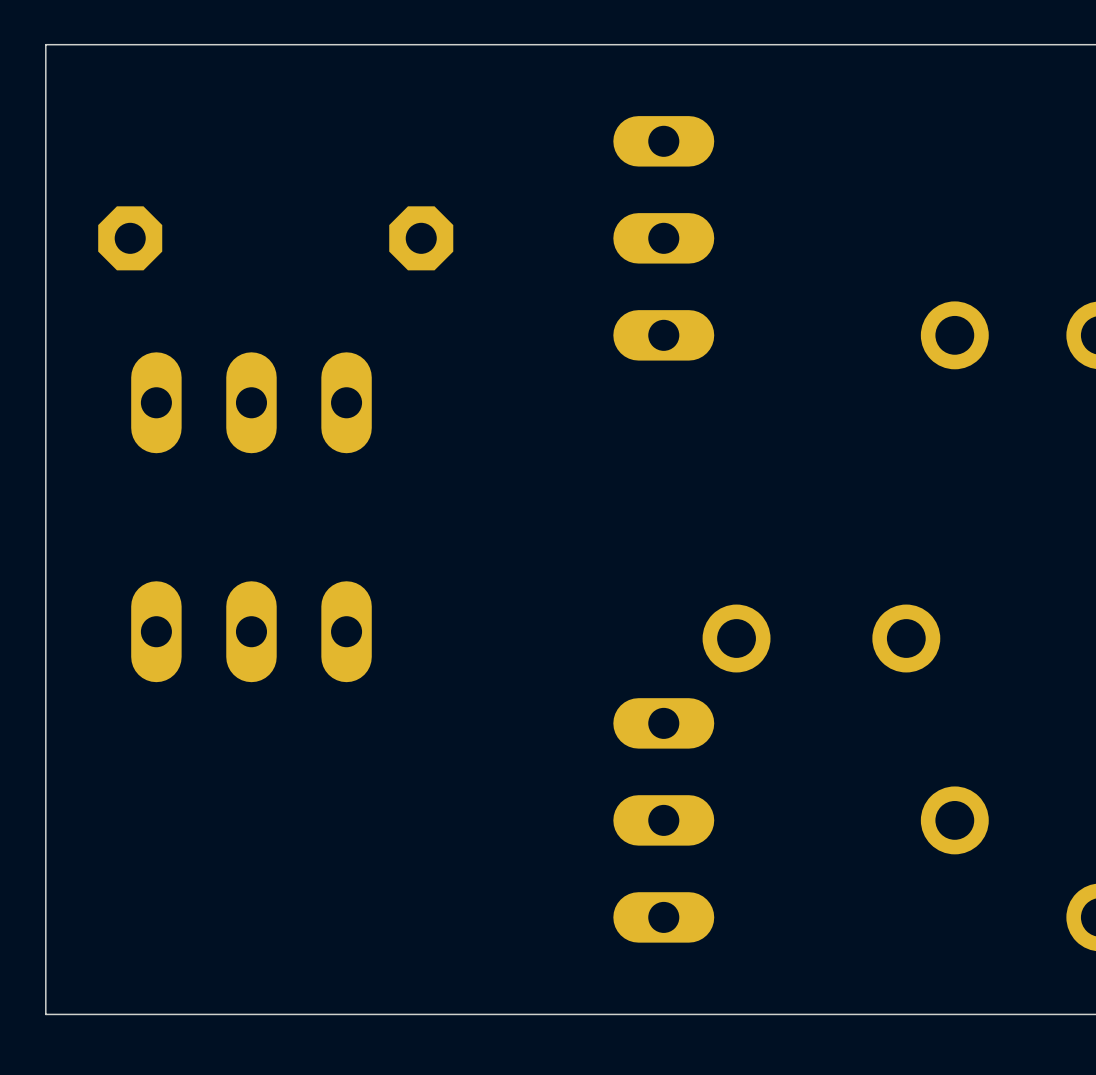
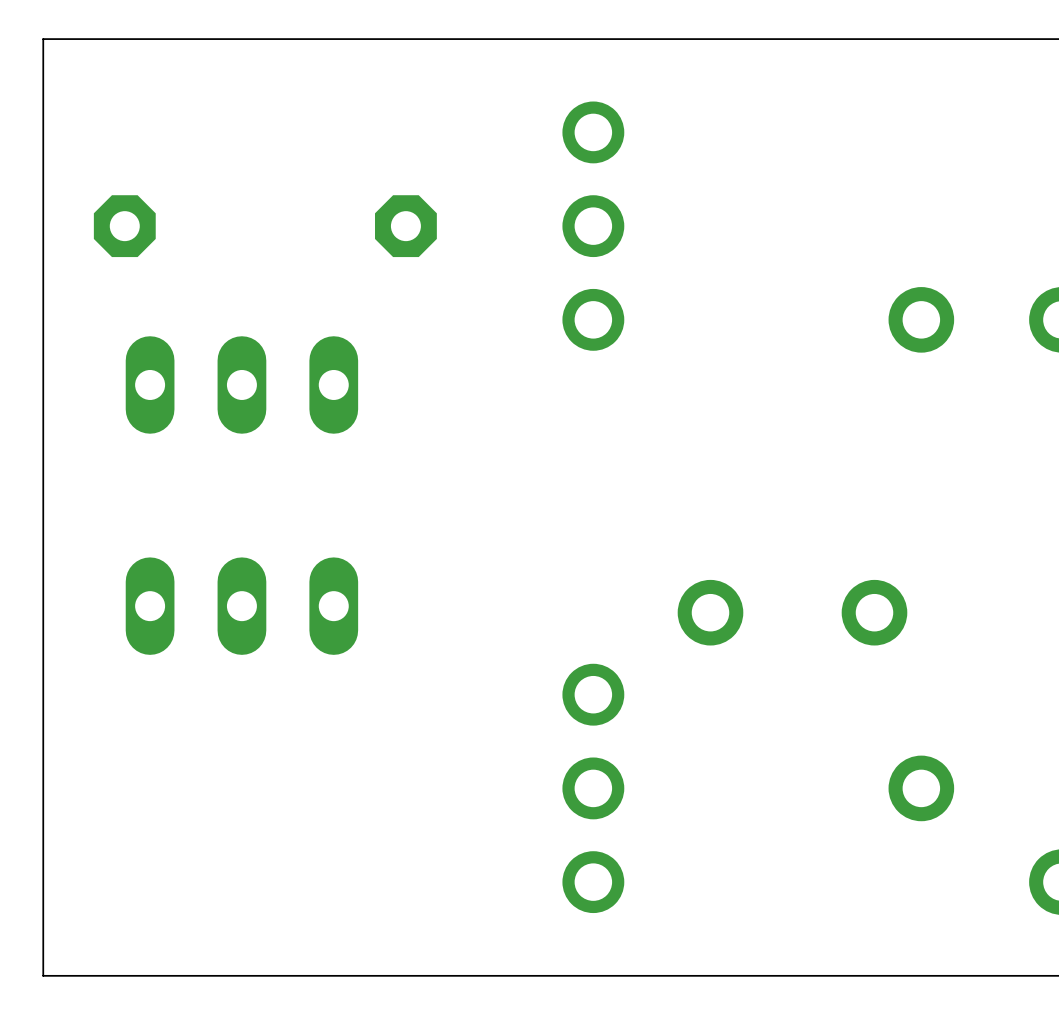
part: none -> (593, 226)
part: (663, 238) -> none
part: none -> (593, 788)
part: (663, 820) -> none

